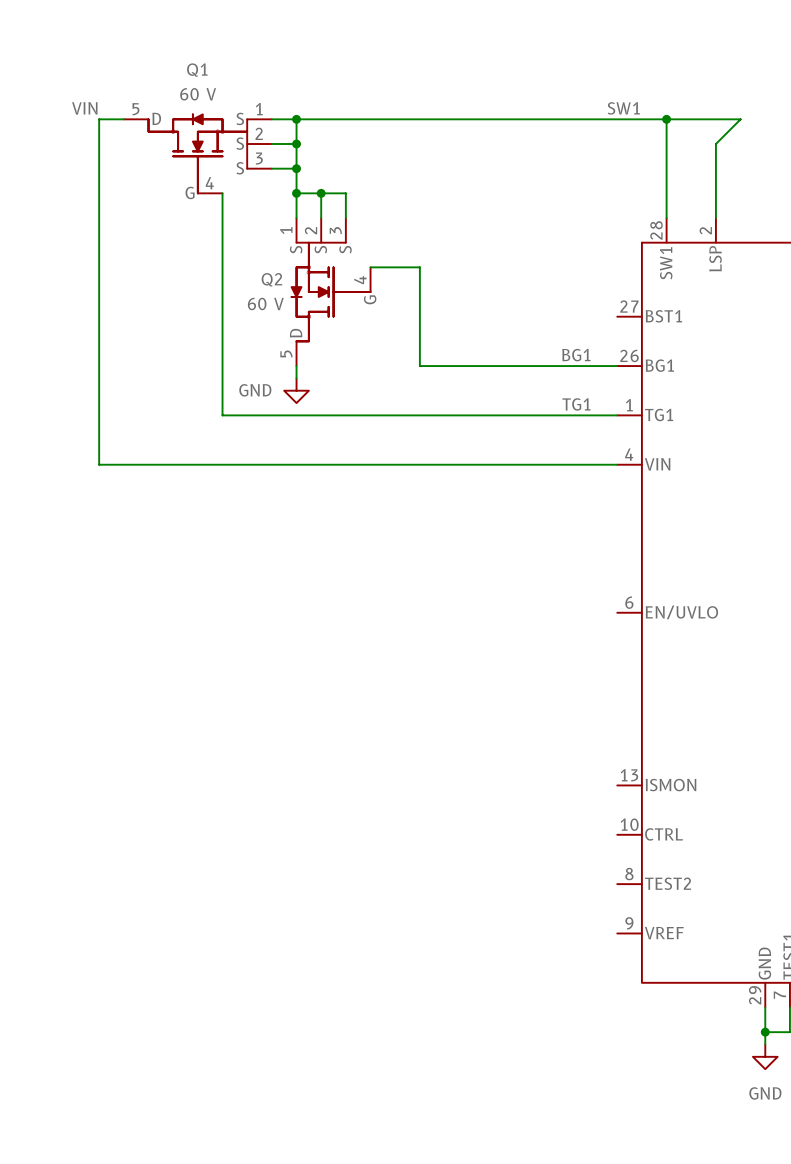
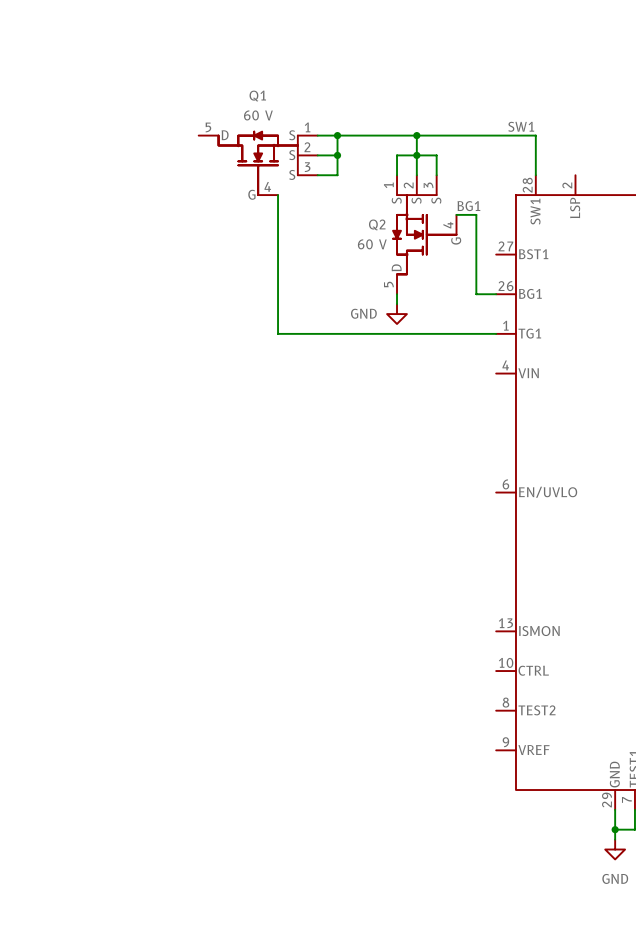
label: VIN (84, 108) -> none
label position: SW1 (623, 108) -> SW1 (521, 126)
wire: (123, 119) (99, 119) (99, 464) (617, 464) -> none
wire: (271, 119) (740, 119) (715, 144) (715, 218) -> none
wire: (296, 119) (296, 218) -> none
junction: (296, 119) -> none
wire: (666, 119) (666, 168) -> (317, 135) (535, 135)
junction: (666, 119) -> none
wire: (271, 144) (296, 144) -> none
junction: (296, 144) -> none
Q1 position: (197, 153) -> (258, 163)
wire: (271, 168) (296, 168) -> (317, 155) (337, 155)
junction: (296, 168) -> none
wire: none -> (337, 135) (337, 175) (317, 175)
junction: none -> (337, 135)
wire: none -> (416, 135) (416, 175)
junction: none -> (416, 135)
wire: (222, 193) (222, 415) (345, 415) -> (278, 195) (278, 333)
wire: (296, 193) (345, 193) (345, 218) -> none
junction: (296, 193) -> none
junction: (321, 193) -> none
junction: none -> (337, 155)
junction: none -> (416, 155)
wire: none -> (397, 175) (397, 155) (436, 155) (436, 175)
wire: (370, 267) (419, 267) (419, 366) (592, 366) -> (456, 214) (476, 214) (476, 294)
Q2 position: (331, 292) -> (424, 234)
label position: BG1 (576, 355) -> BG1 (468, 206)
wire: (296, 366) (296, 378) -> (397, 294) (397, 304)
power symbol position: GND (296, 390) -> GND (397, 314)
label: TG1 (576, 404) -> none

